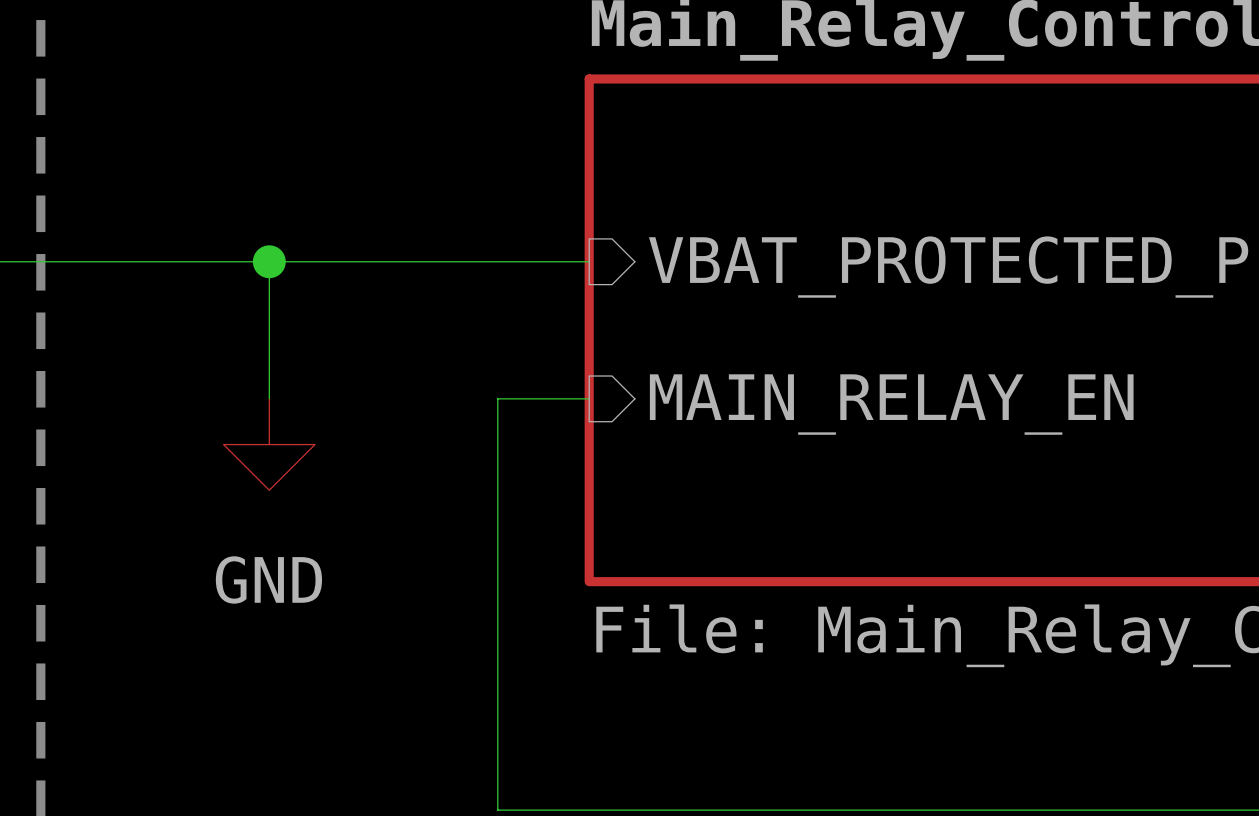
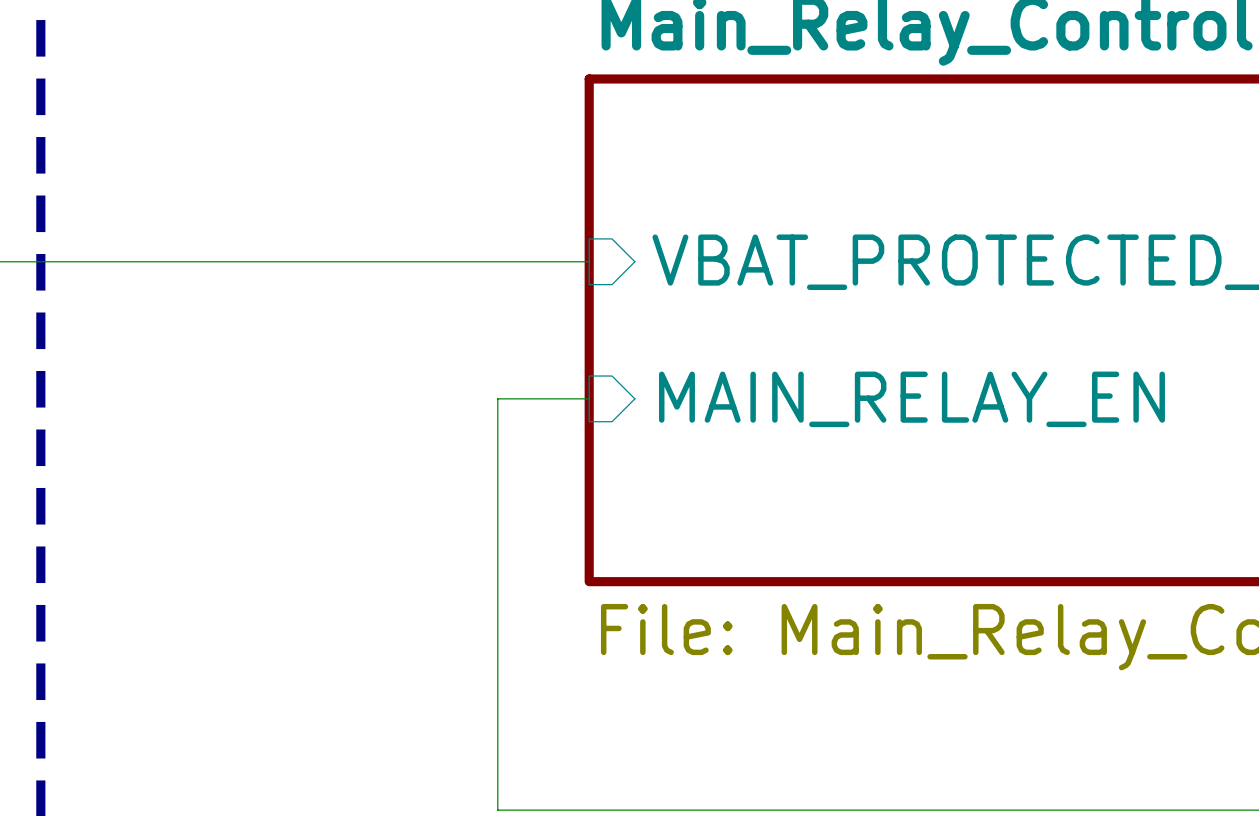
wire: (269, 261) (269, 398) -> none
junction: (269, 261) -> none
power symbol: GND (269, 444) -> none

